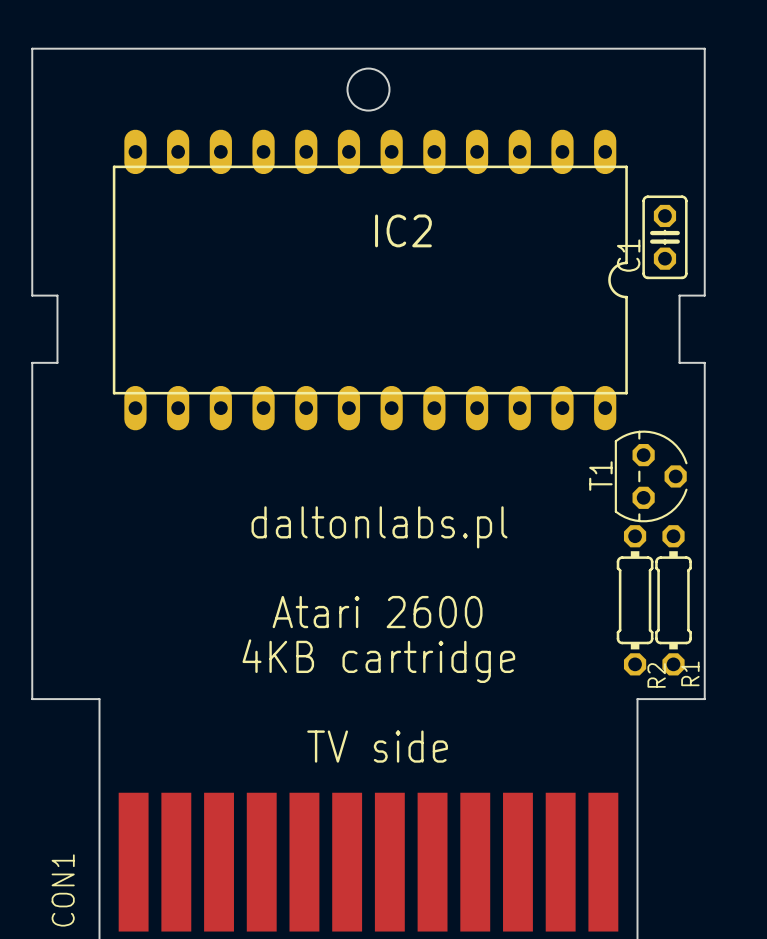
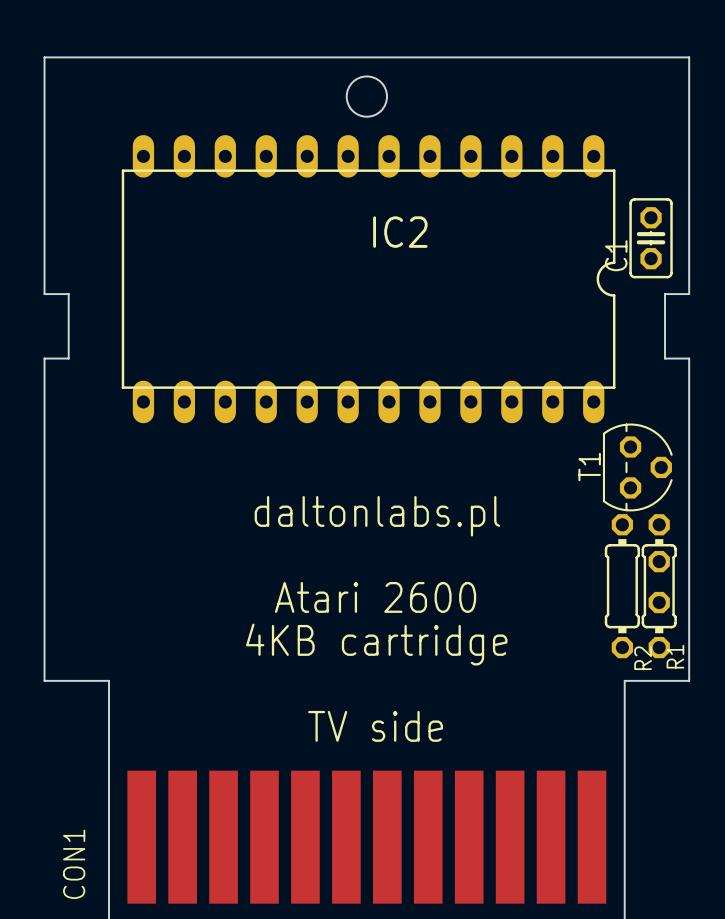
part: none -> (659, 582)

